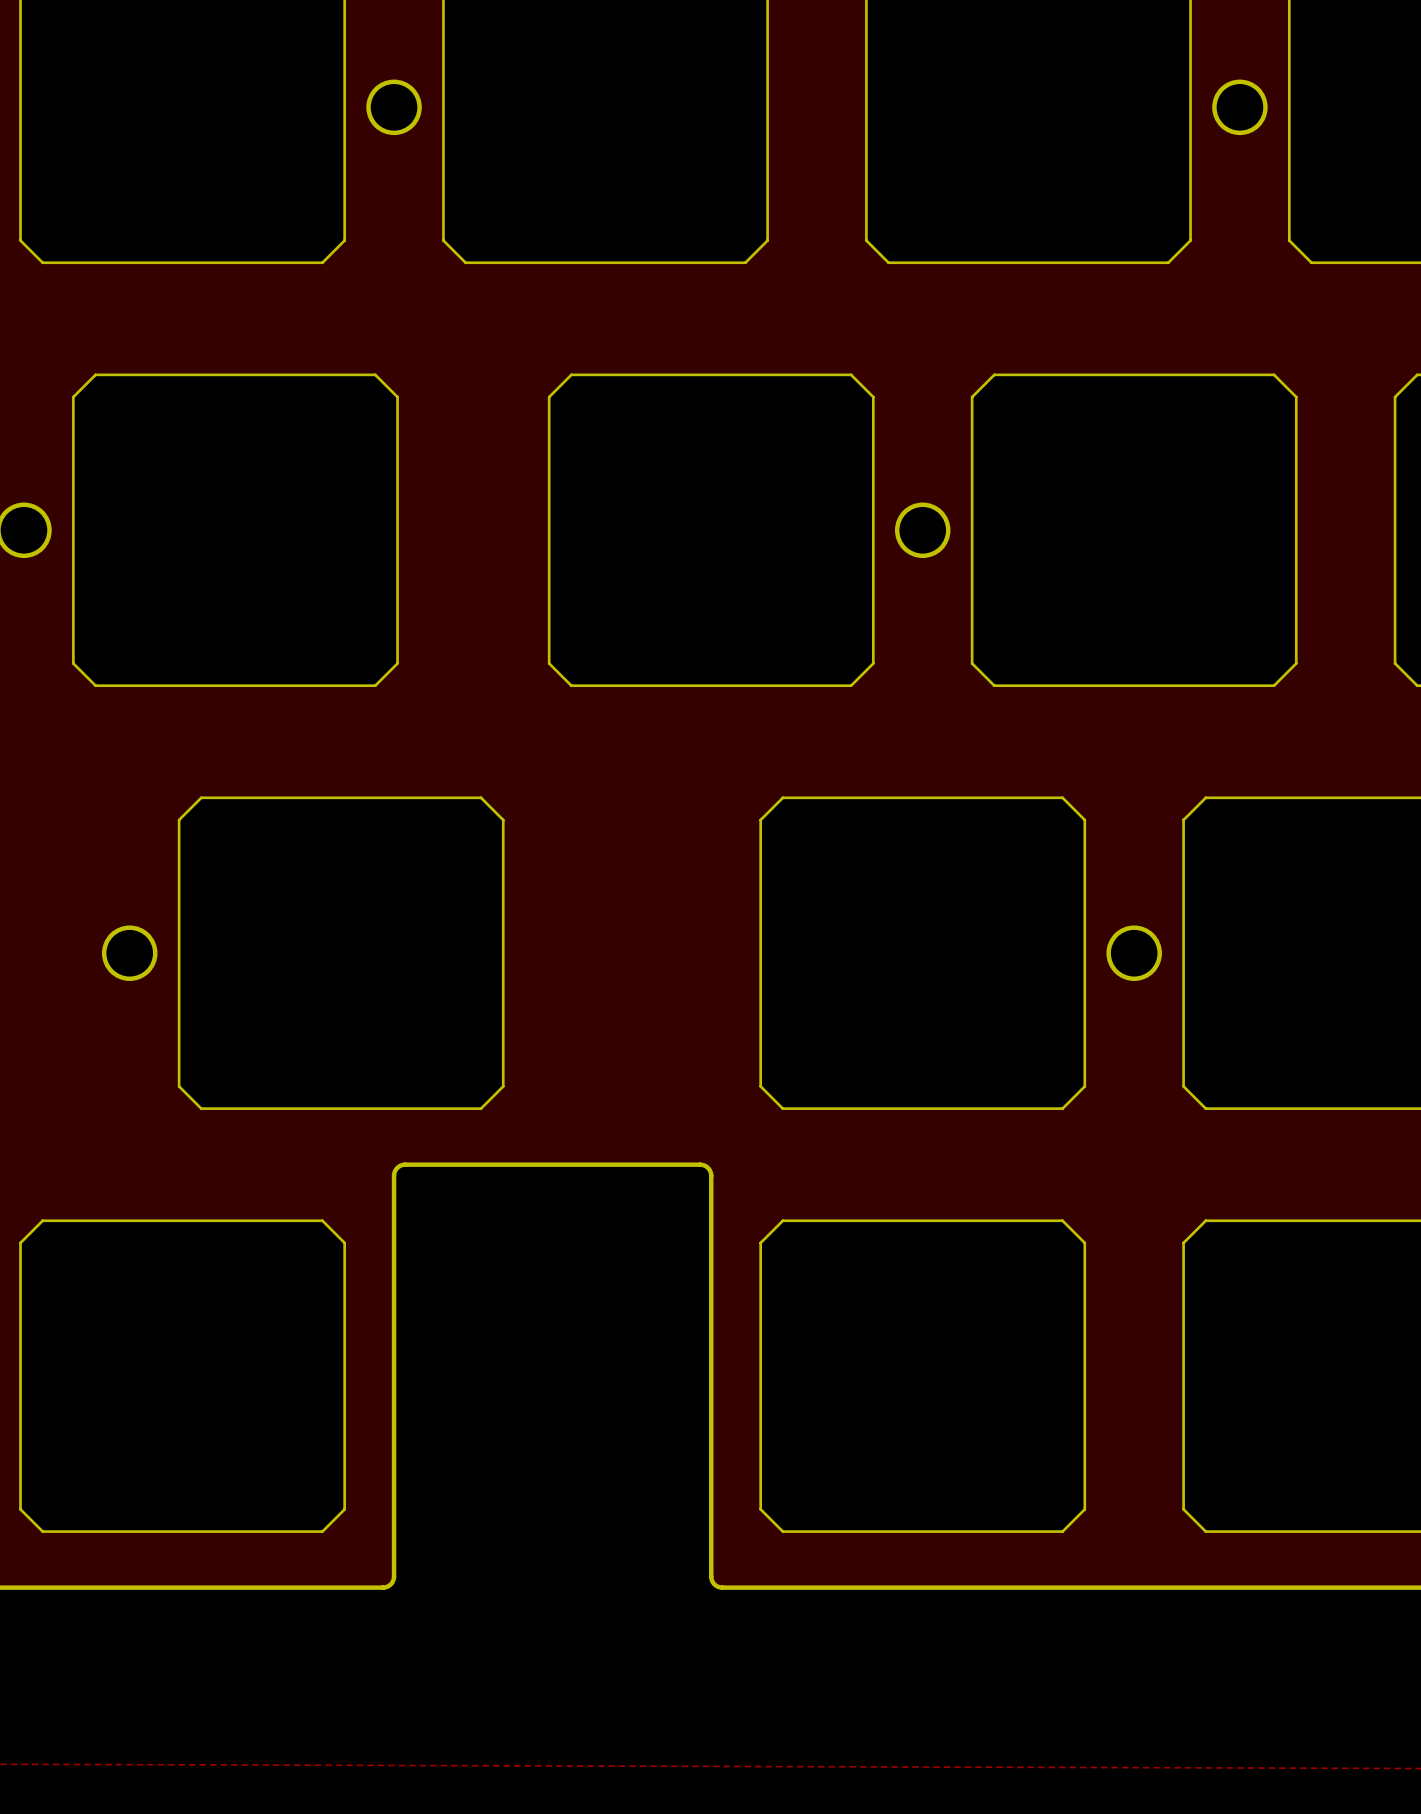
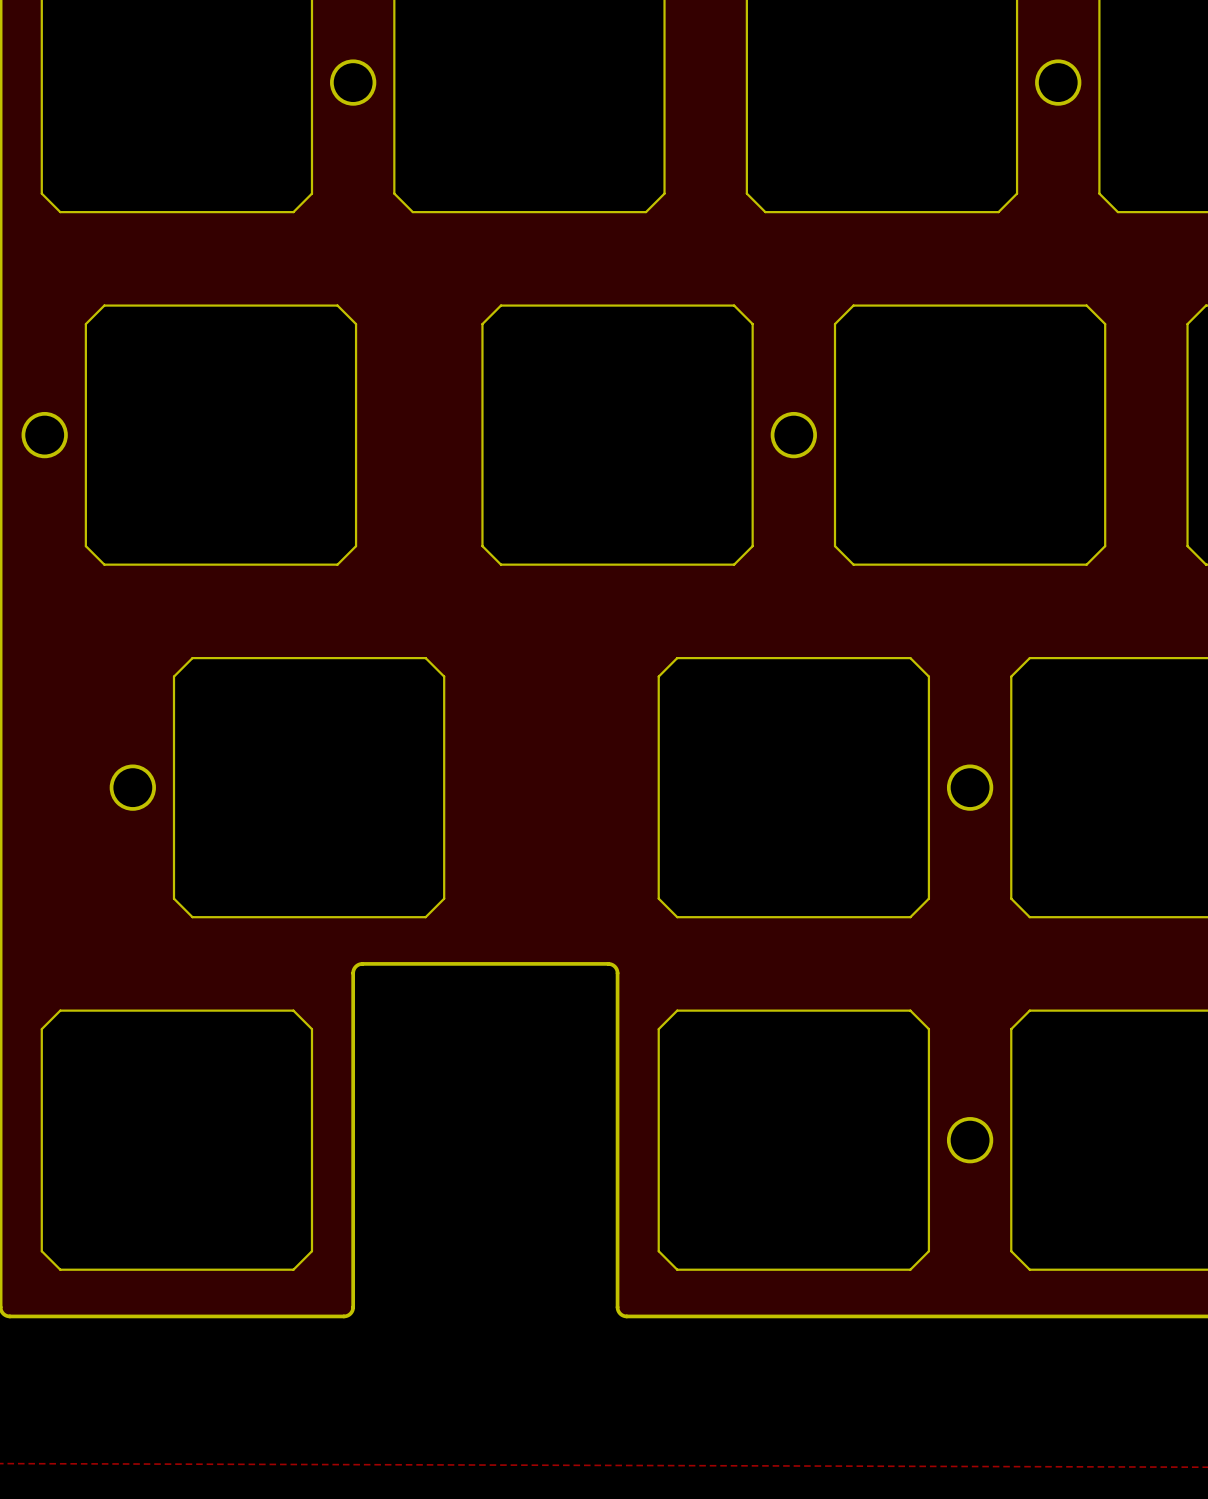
round board edge: none -> [946, 1117, 994, 1164]

